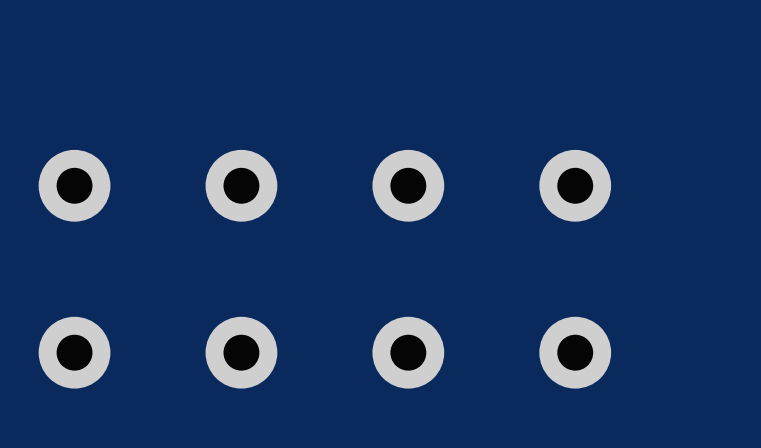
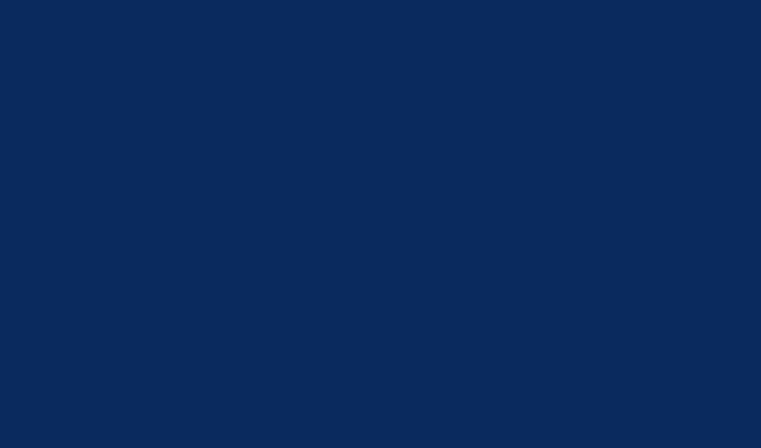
part: (74, 185) -> none
part: (241, 185) -> none
part: (408, 185) -> none
part: (575, 185) -> none
part: (74, 352) -> none
part: (241, 352) -> none
part: (408, 352) -> none
part: (575, 352) -> none

